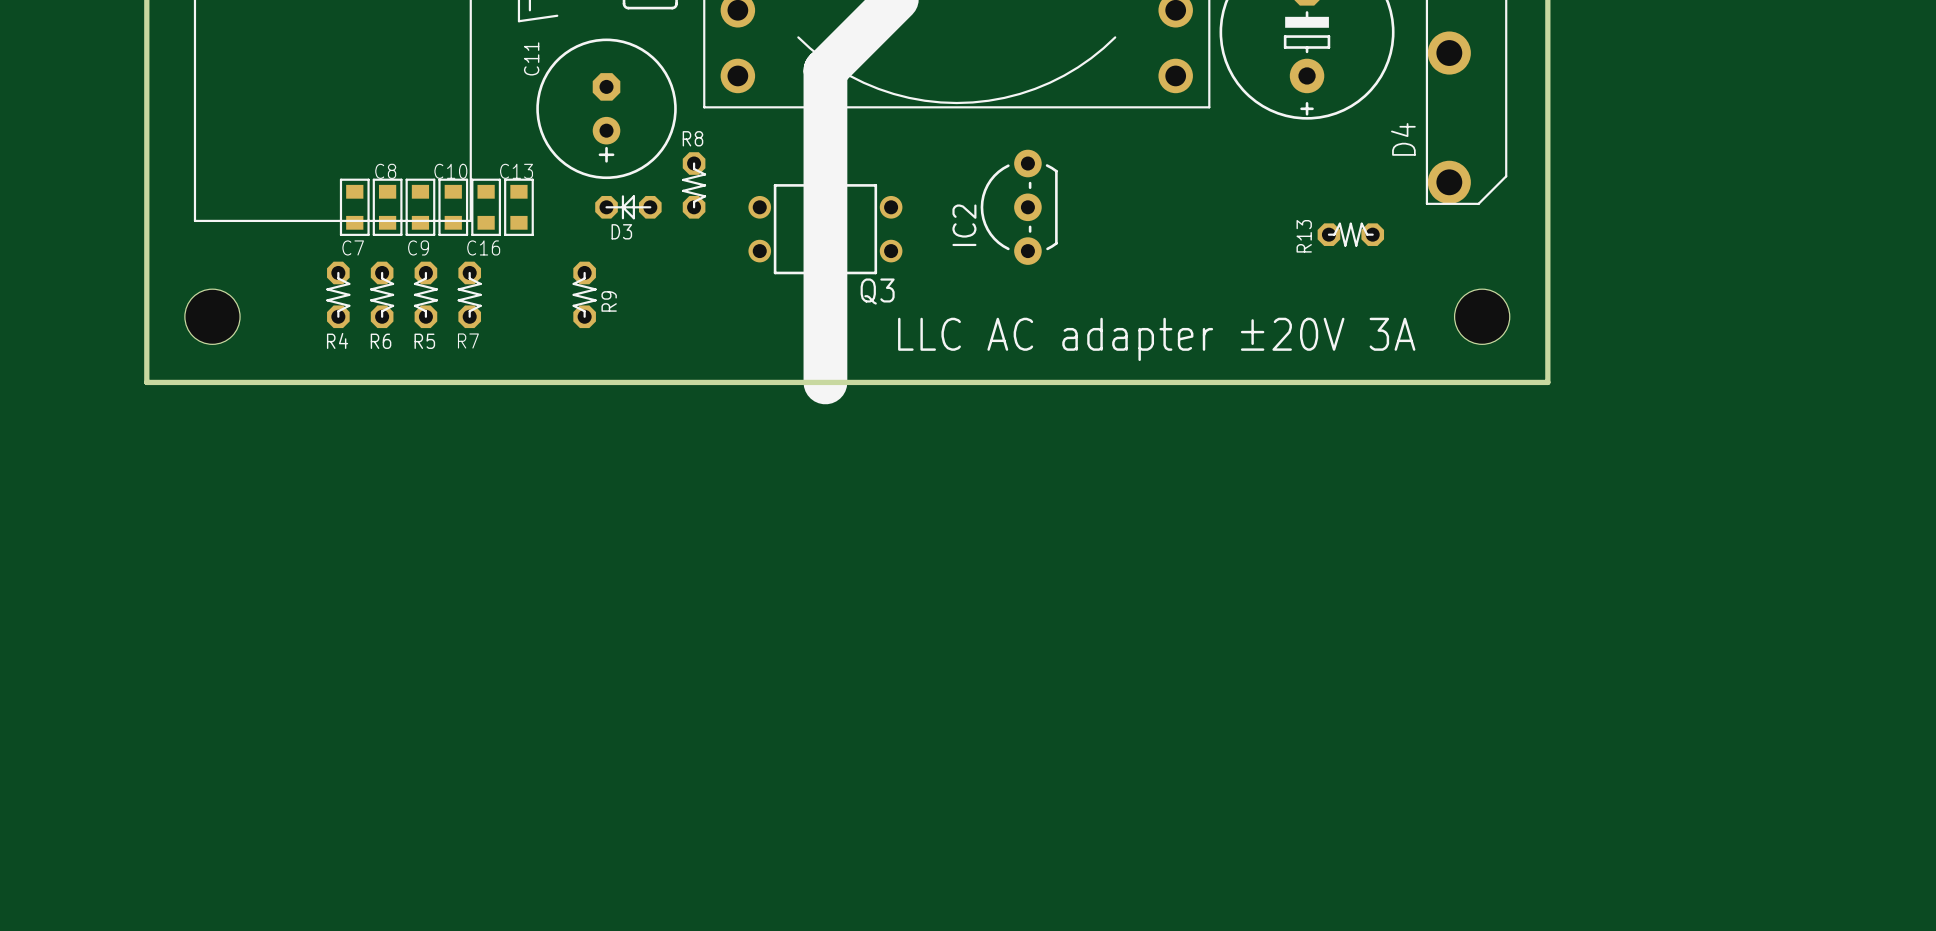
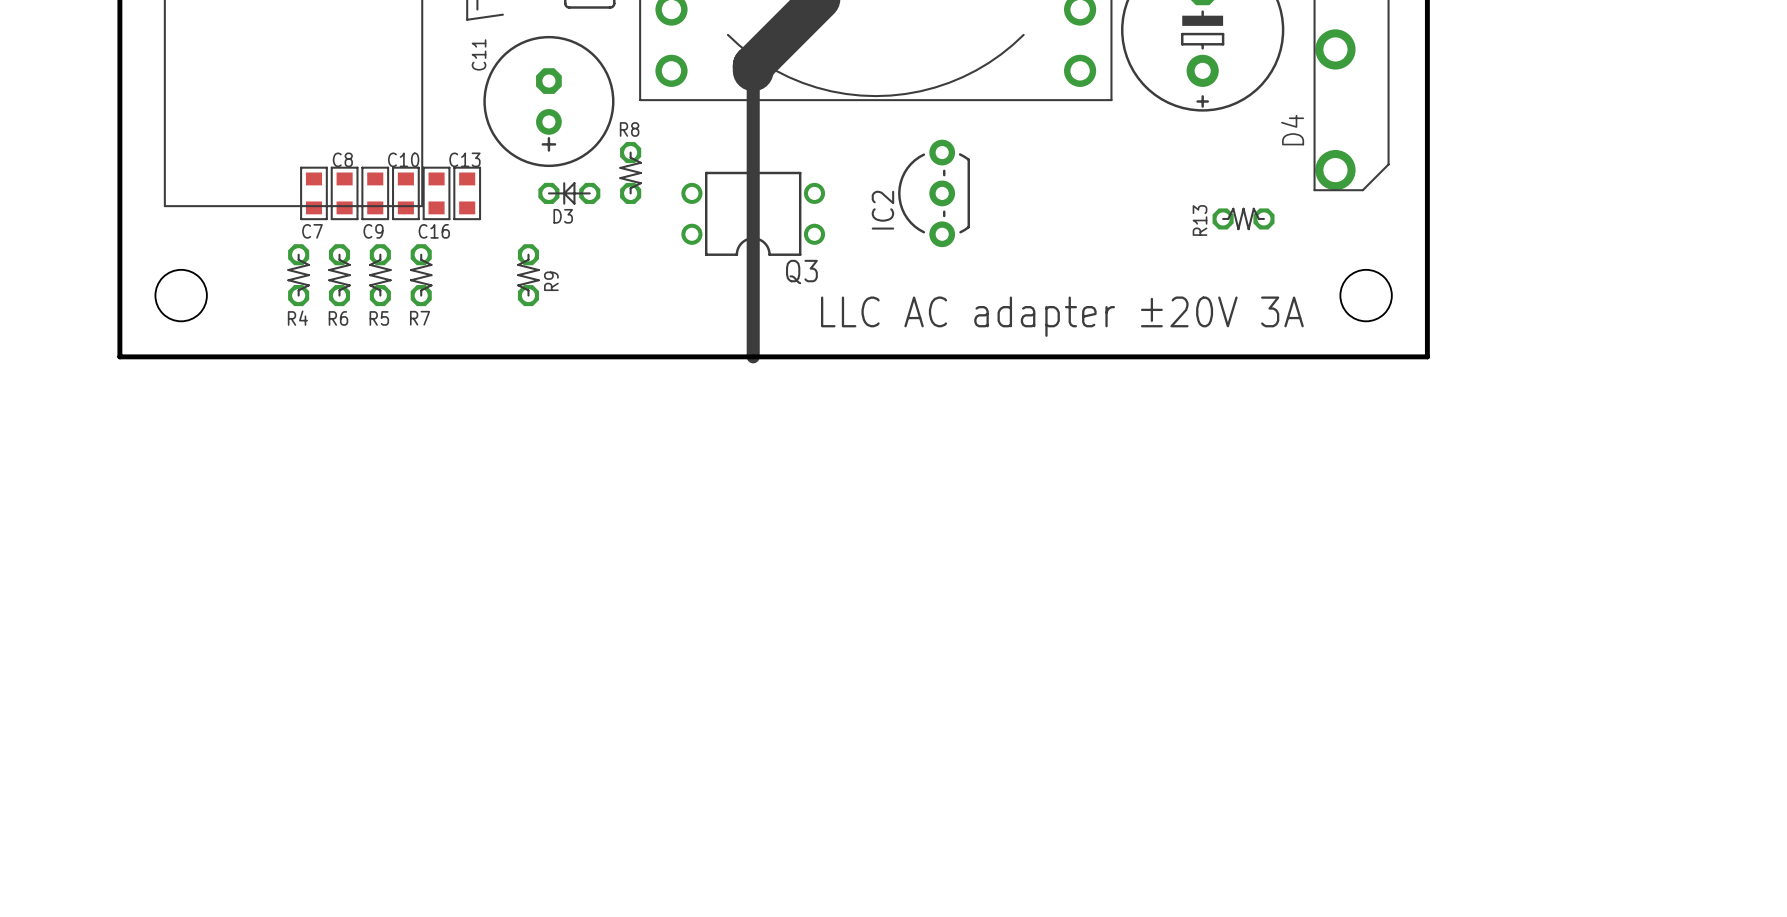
line width: thick (825, 75) (825, 382) -> thin (753, 70) (753, 356)

